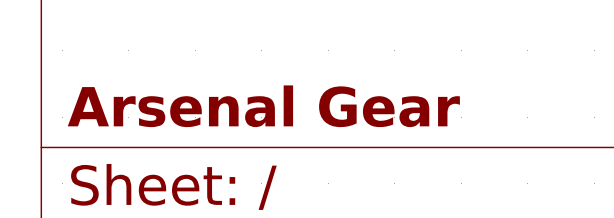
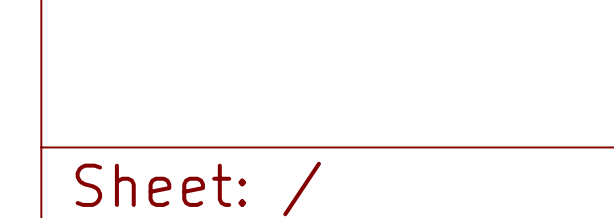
title block: Arsenal Gear (263, 106) -> none

